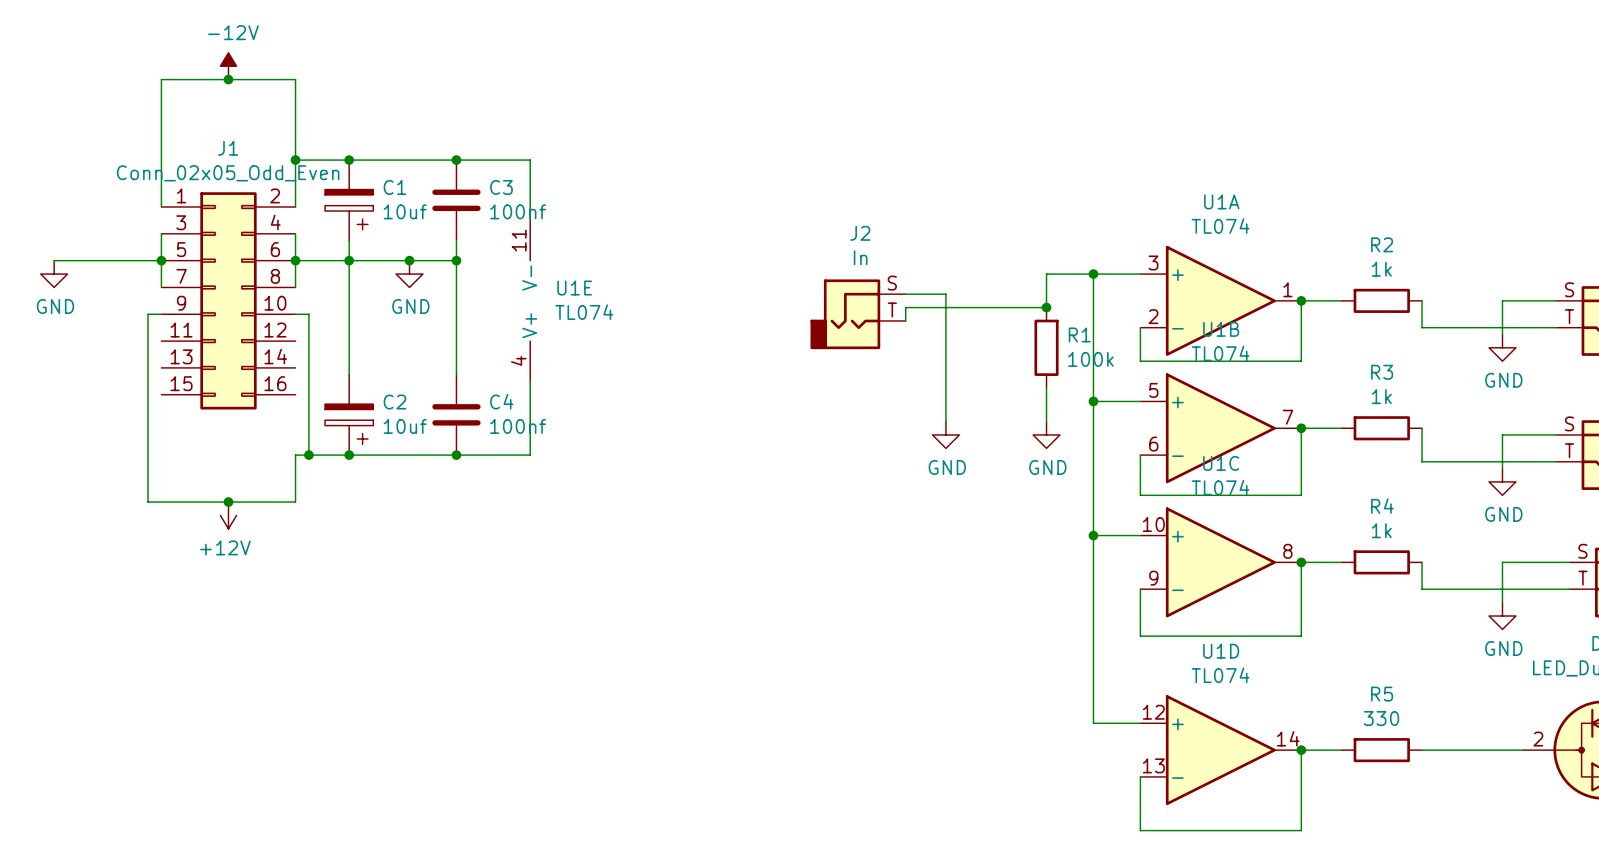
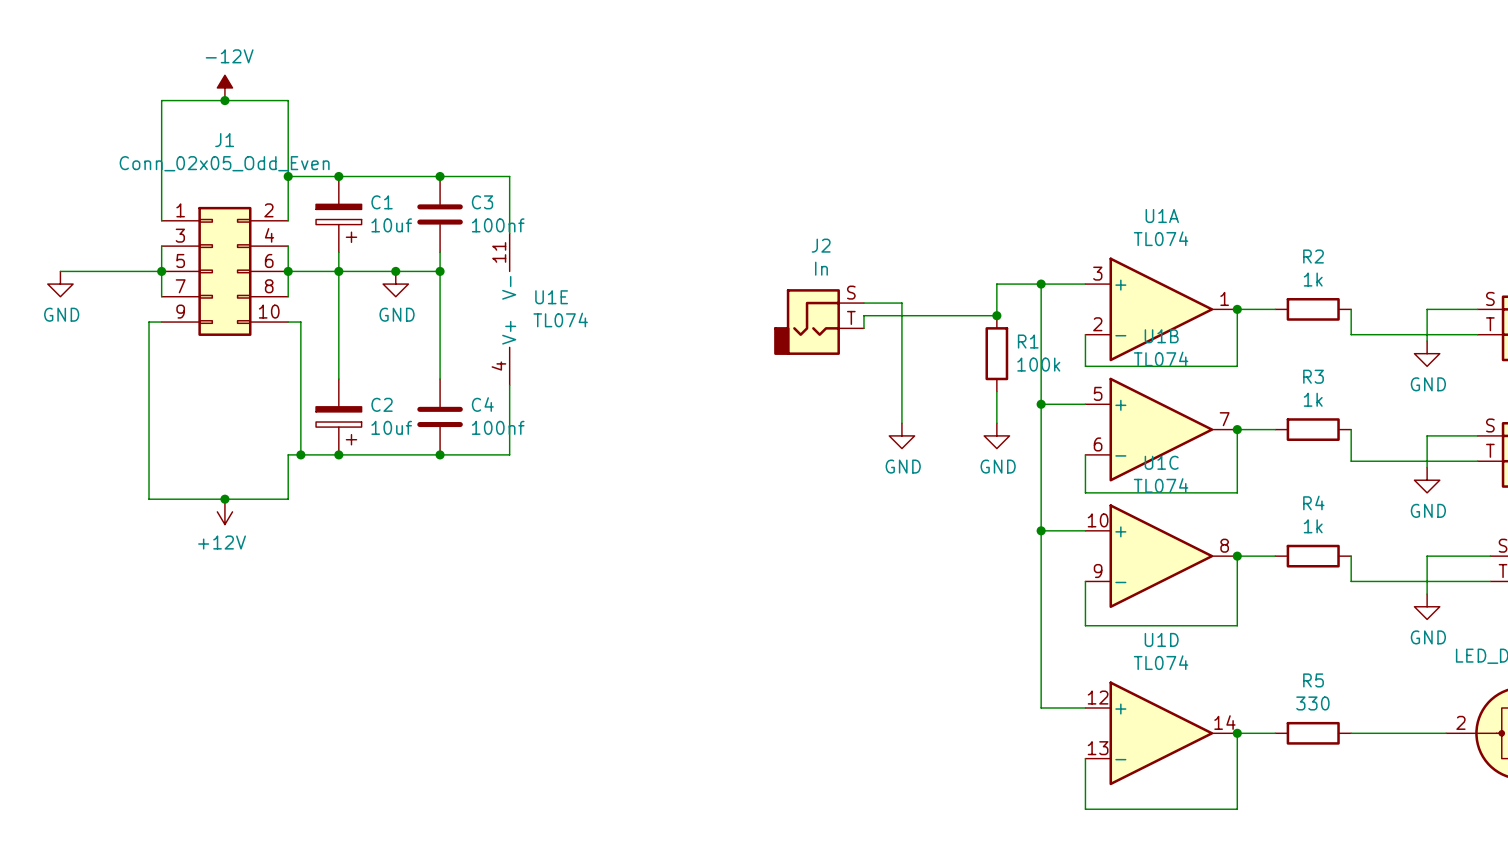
J1 symbol: [161, 192, 296, 410] -> [161, 206, 289, 336]

